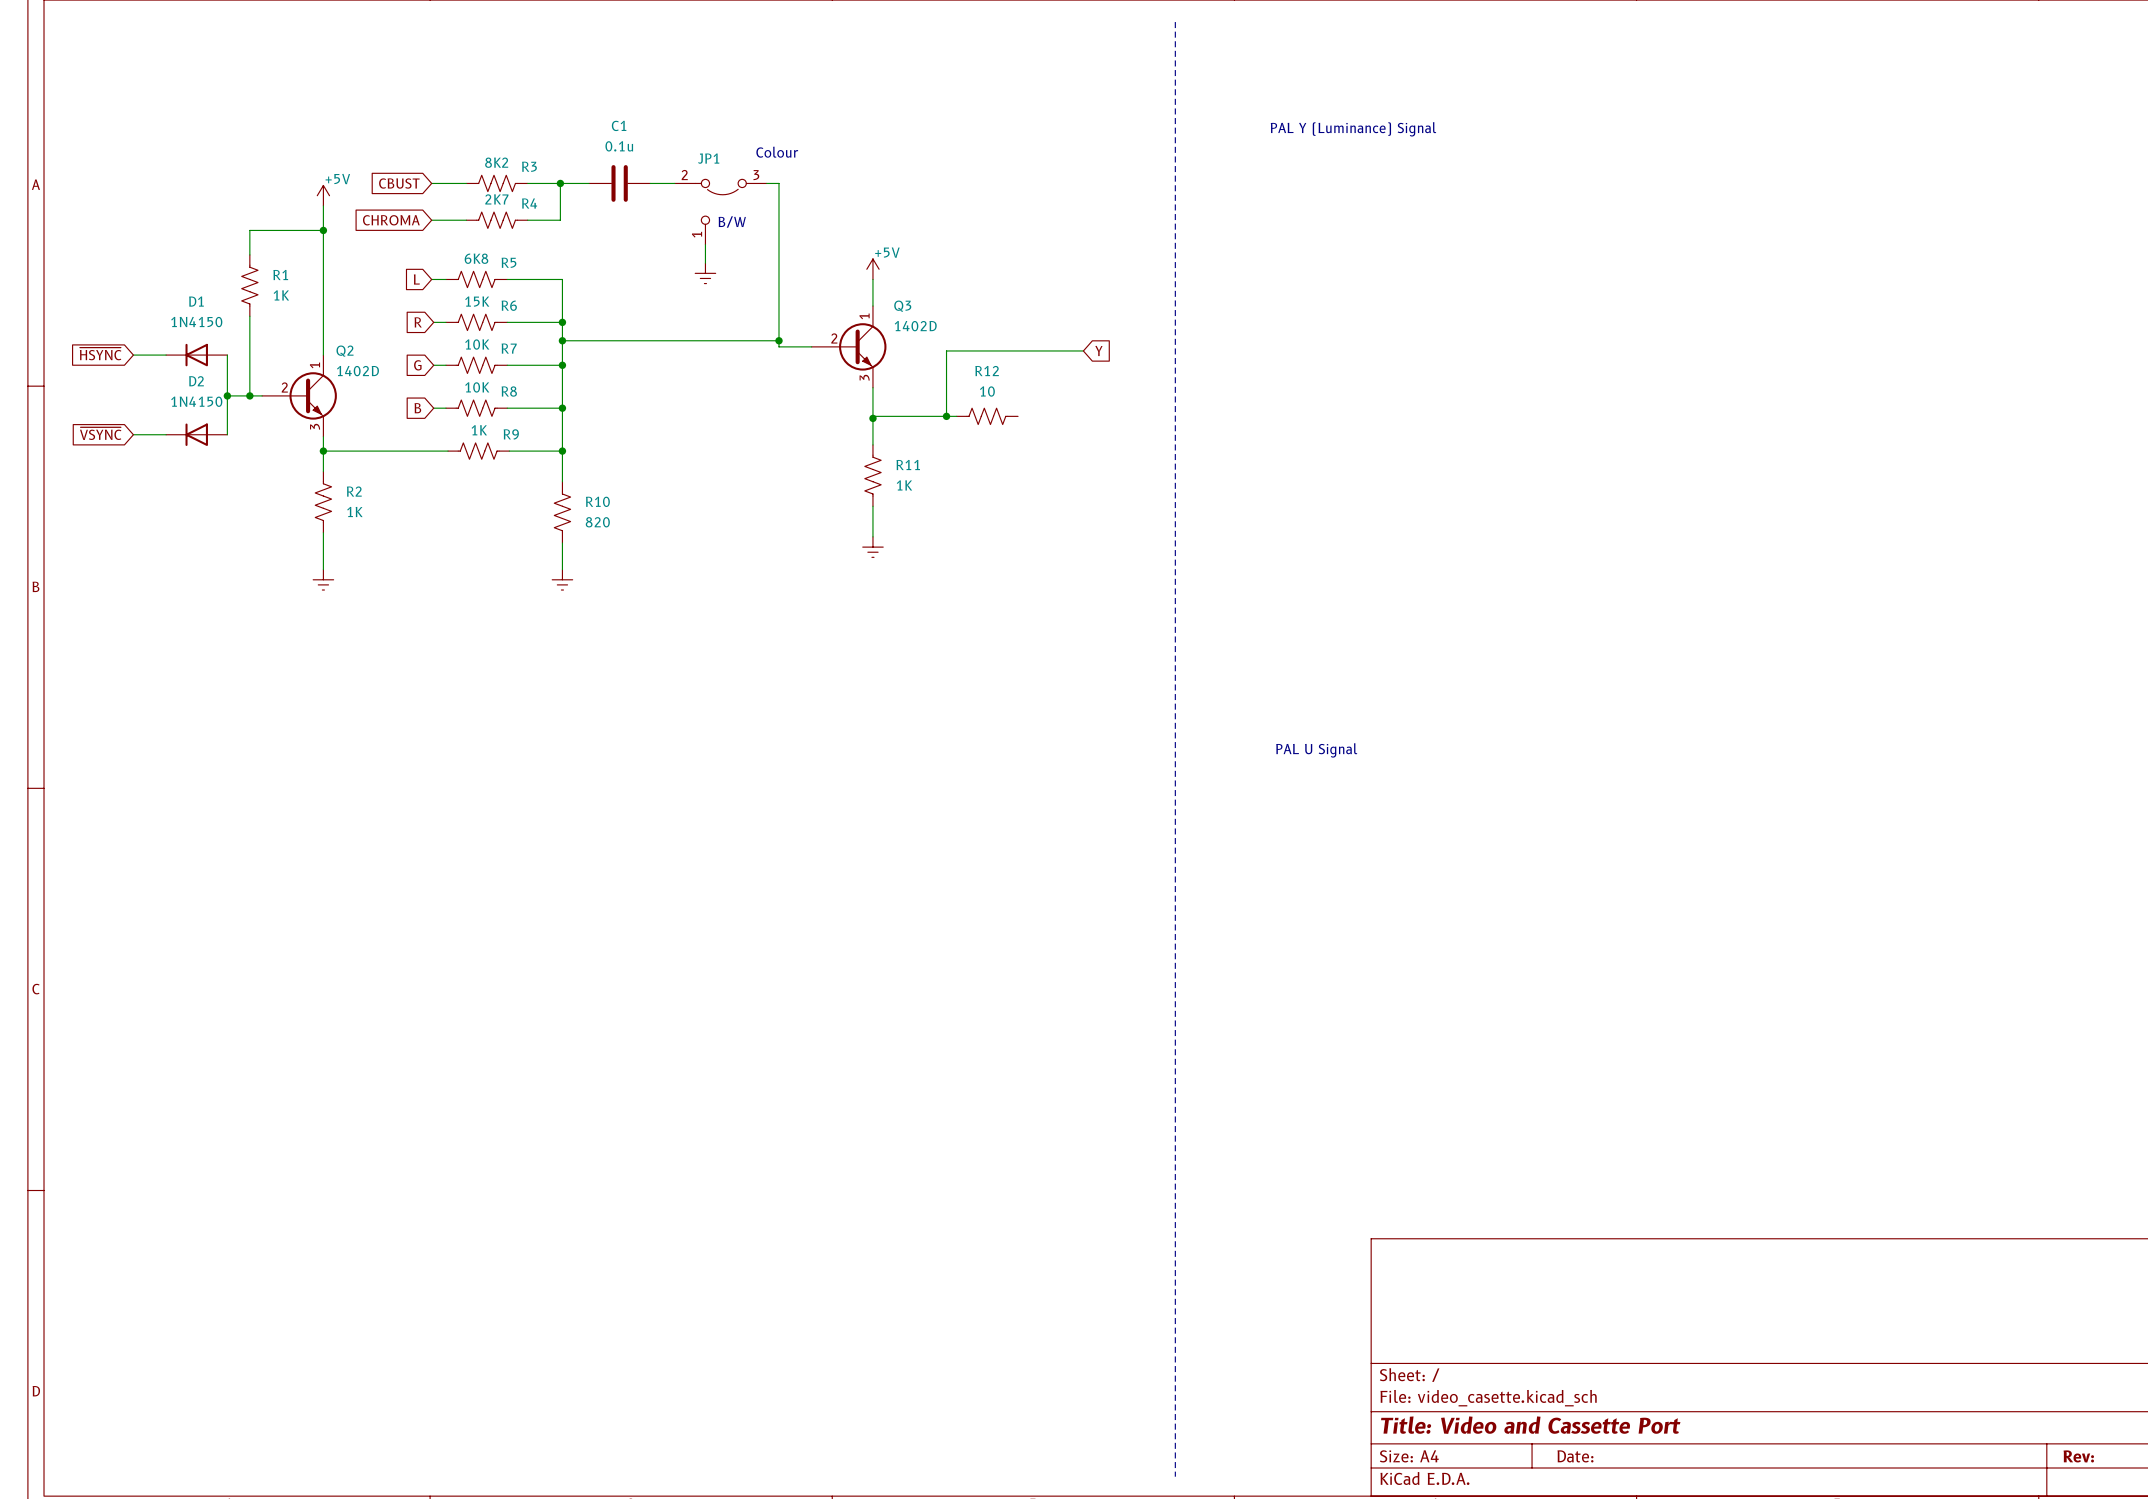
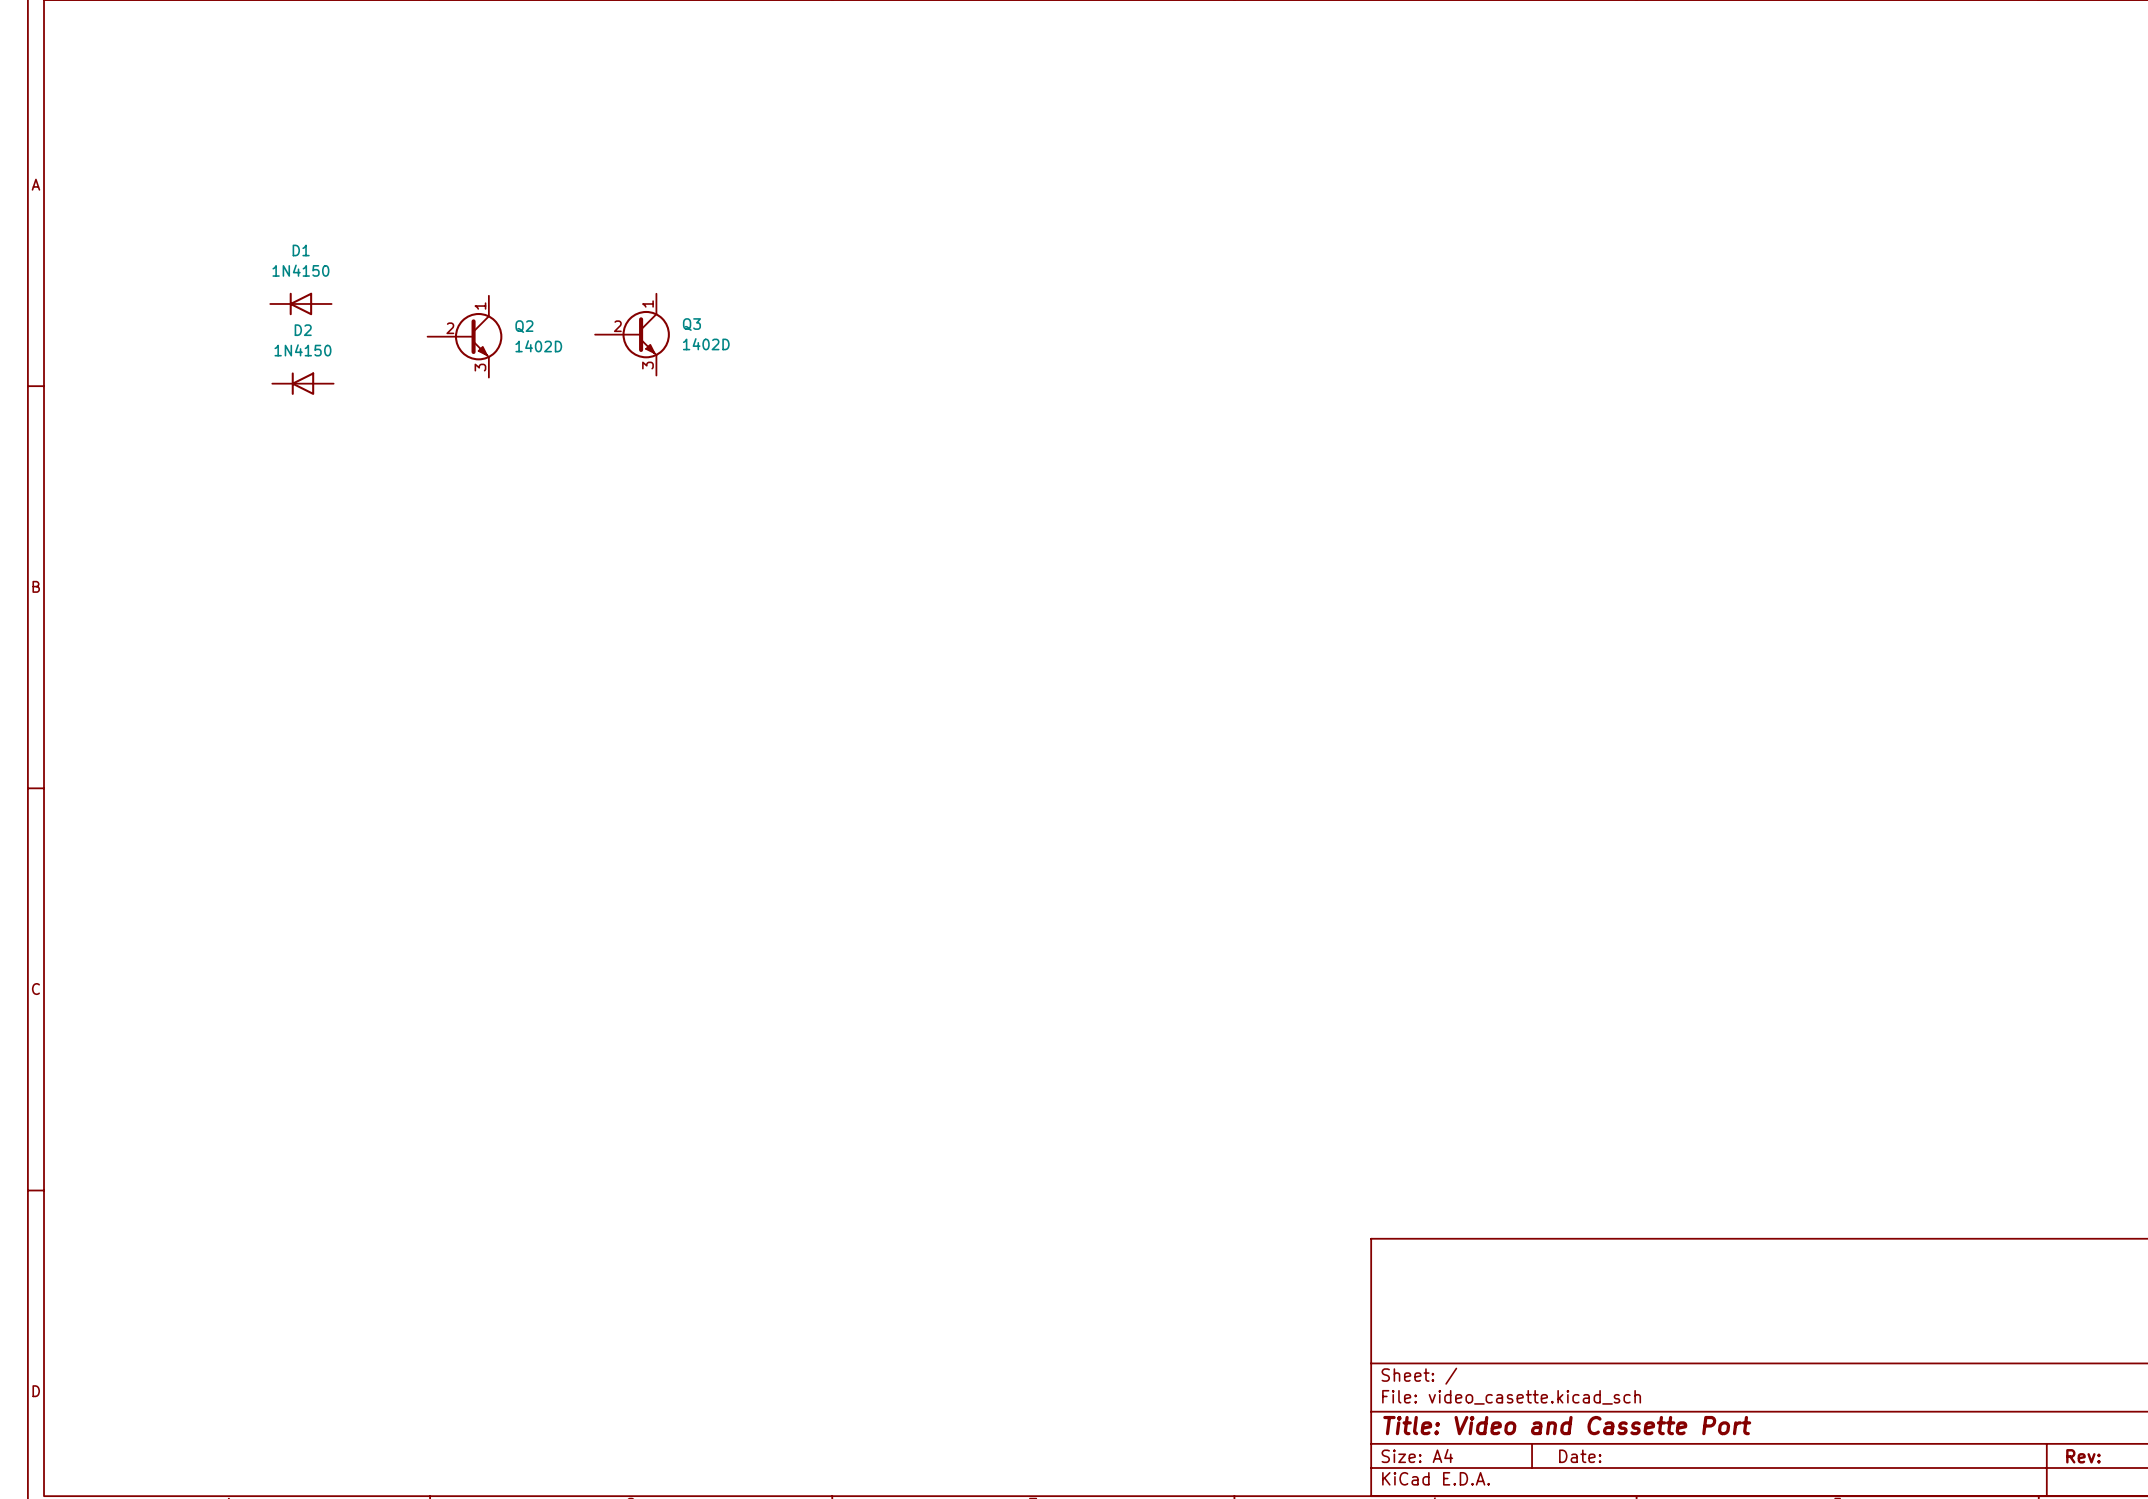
line: (1175, 22) (1175, 1476) -> none
text: PAL Y (Luminance) Signal (1353, 129) -> none
text: Colour (777, 152) -> none
global label: CBUST (399, 183) -> none
wire: (431, 183) (466, 183) -> none
R3: 8K2 (497, 183) -> none
wire: (527, 183) (588, 183) -> none
wire: (560, 183) (560, 220) (527, 220) -> none
junction: (560, 183) -> none
C1: 0.1u (619, 183) -> none
wire: (650, 183) (674, 183) -> none
wire: (766, 183) (778, 183) (778, 346) (811, 346) -> none
power symbol: +5V (323, 195) -> none
wire: (323, 205) (323, 355) -> none
JP1: (720, 212) -> none
global label: CHROMA (391, 220) -> none
wire: (431, 220) (466, 220) -> none
R4: 2K7 (497, 220) -> none
text: B/W (732, 221) -> none
wire: (323, 230) (249, 230) (249, 254) -> none
junction: (323, 230) -> none
wire: (705, 244) (705, 263) -> none
power symbol: +5V (872, 269) -> none
power symbol: (705, 273) -> none
global label: L (416, 279) -> none
wire: (431, 279) (445, 279) -> none
R5: 6K8 (476, 279) -> none
wire: (507, 279) (562, 279) (562, 481) -> none
wire: (872, 279) (872, 306) -> none
R1: 1K (249, 285) -> none
Q3 name position: Q3 (902, 306) -> Q3 (691, 324)
wire: (249, 316) (249, 395) -> none
global label: R (418, 322) -> none
wire: (433, 322) (445, 322) -> none
R6: 15K (476, 322) -> none
wire: (507, 322) (562, 322) -> none
junction: (562, 322) -> none
Q3 value position: 1402D (915, 326) -> 1402D (706, 344)
wire: (562, 340) (778, 340) -> none
junction: (562, 340) -> none
junction: (778, 340) -> none
Q3 position: (849, 346) -> (632, 334)
wire: (1083, 350) (946, 350) (946, 416) -> none
global label: Y (1098, 350) -> none
Q2 name position: Q2 (345, 351) -> Q2 (524, 326)
global label: ~{HSYNC} (100, 353) -> none
wire: (133, 355) (166, 355) -> none
D1 position: (196, 355) -> (300, 303)
wire: (227, 355) (227, 434) -> none
global label: G (417, 365) -> none
wire: (433, 365) (445, 365) -> none
R7: 10K (476, 365) -> none
wire: (507, 365) (562, 365) -> none
junction: (562, 365) -> none
Q2 value position: 1402D (357, 371) -> 1402D (538, 346)
wire: (872, 387) (872, 444) -> none
wire: (227, 395) (262, 395) -> none
junction: (227, 395) -> none
junction: (249, 395) -> none
Q2 position: (299, 395) -> (464, 336)
global label: B (417, 408) -> none
wire: (433, 408) (445, 408) -> none
R8: 10K (476, 408) -> none
wire: (507, 408) (562, 408) -> none
junction: (562, 408) -> none
junction: (946, 416) -> none
wire: (956, 416) (875, 416) (872, 418) -> none
R12: 10 (987, 416) -> none
junction: (872, 418) -> none
global label: ~{VSYNC} (100, 433) -> none
wire: (133, 434) (166, 434) -> none
D2 position: (196, 434) -> (302, 383)
wire: (323, 436) (323, 471) -> none
wire: (323, 451) (448, 451) -> none
junction: (323, 451) -> none
R9: 1K (478, 451) -> none
wire: (509, 451) (562, 451) -> none
junction: (562, 451) -> none
R11: 1K (872, 475) -> none
R2: 1K (323, 502) -> none
wire: (872, 506) (872, 536) -> none
R10: 820 (562, 512) -> none
wire: (323, 532) (323, 569) -> none
wire: (562, 543) (562, 569) -> none
power symbol: (872, 547) -> none
power symbol: (323, 579) -> none
power symbol: (562, 579) -> none
text: PAL U Signal (1316, 750) -> none

